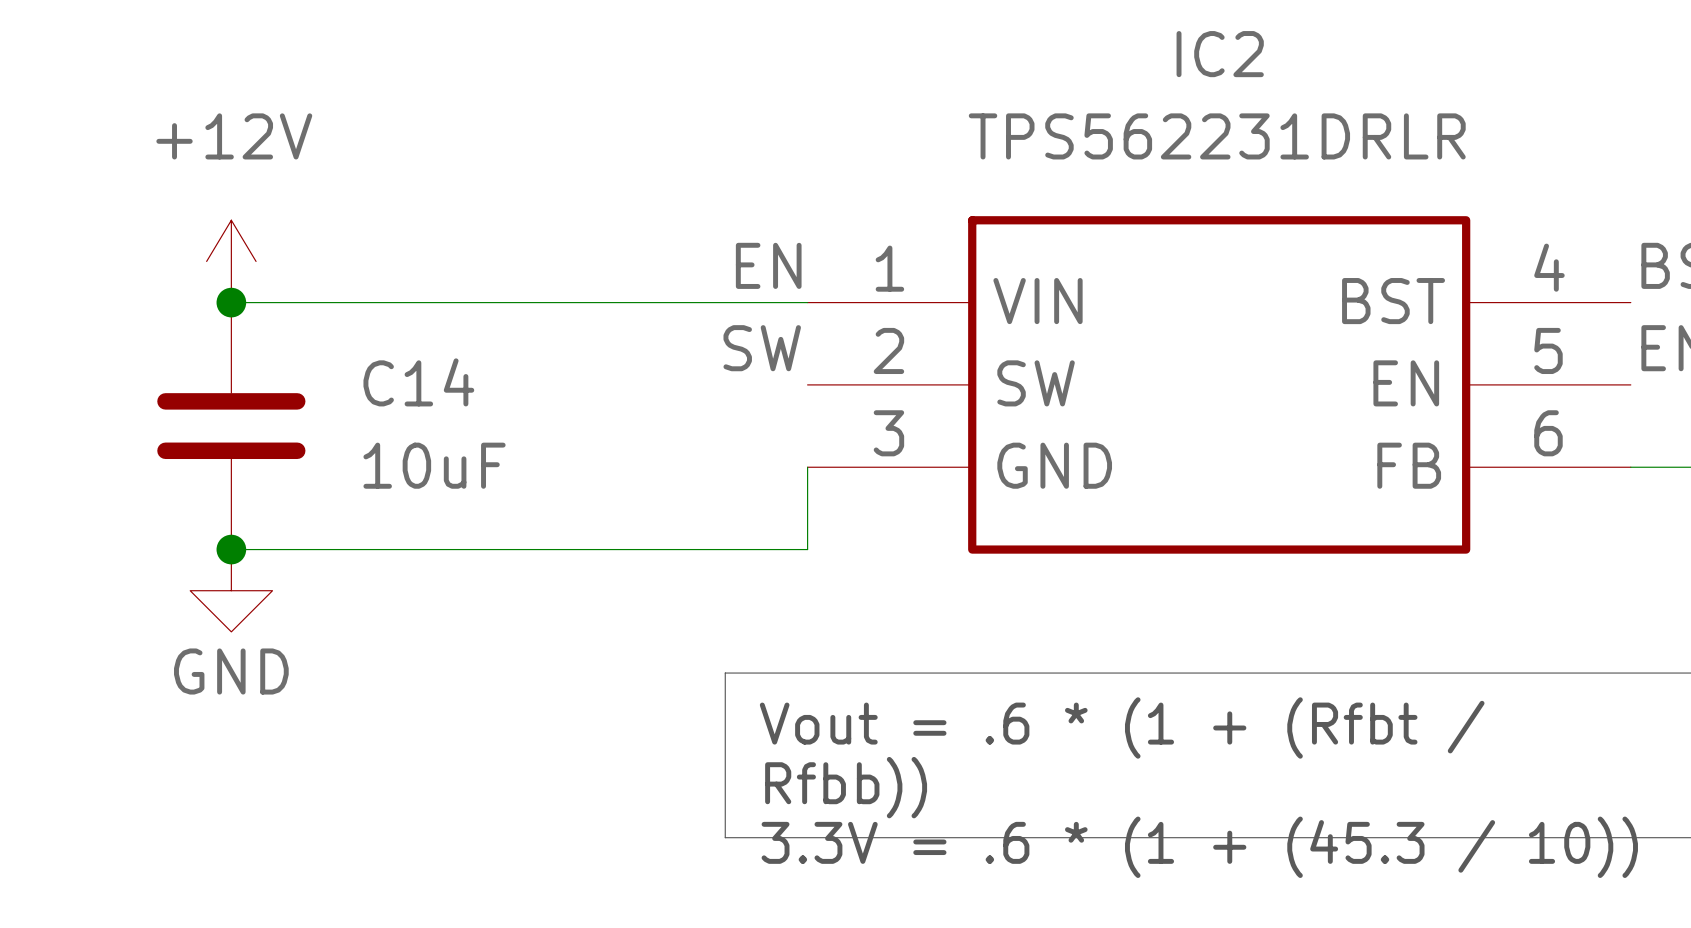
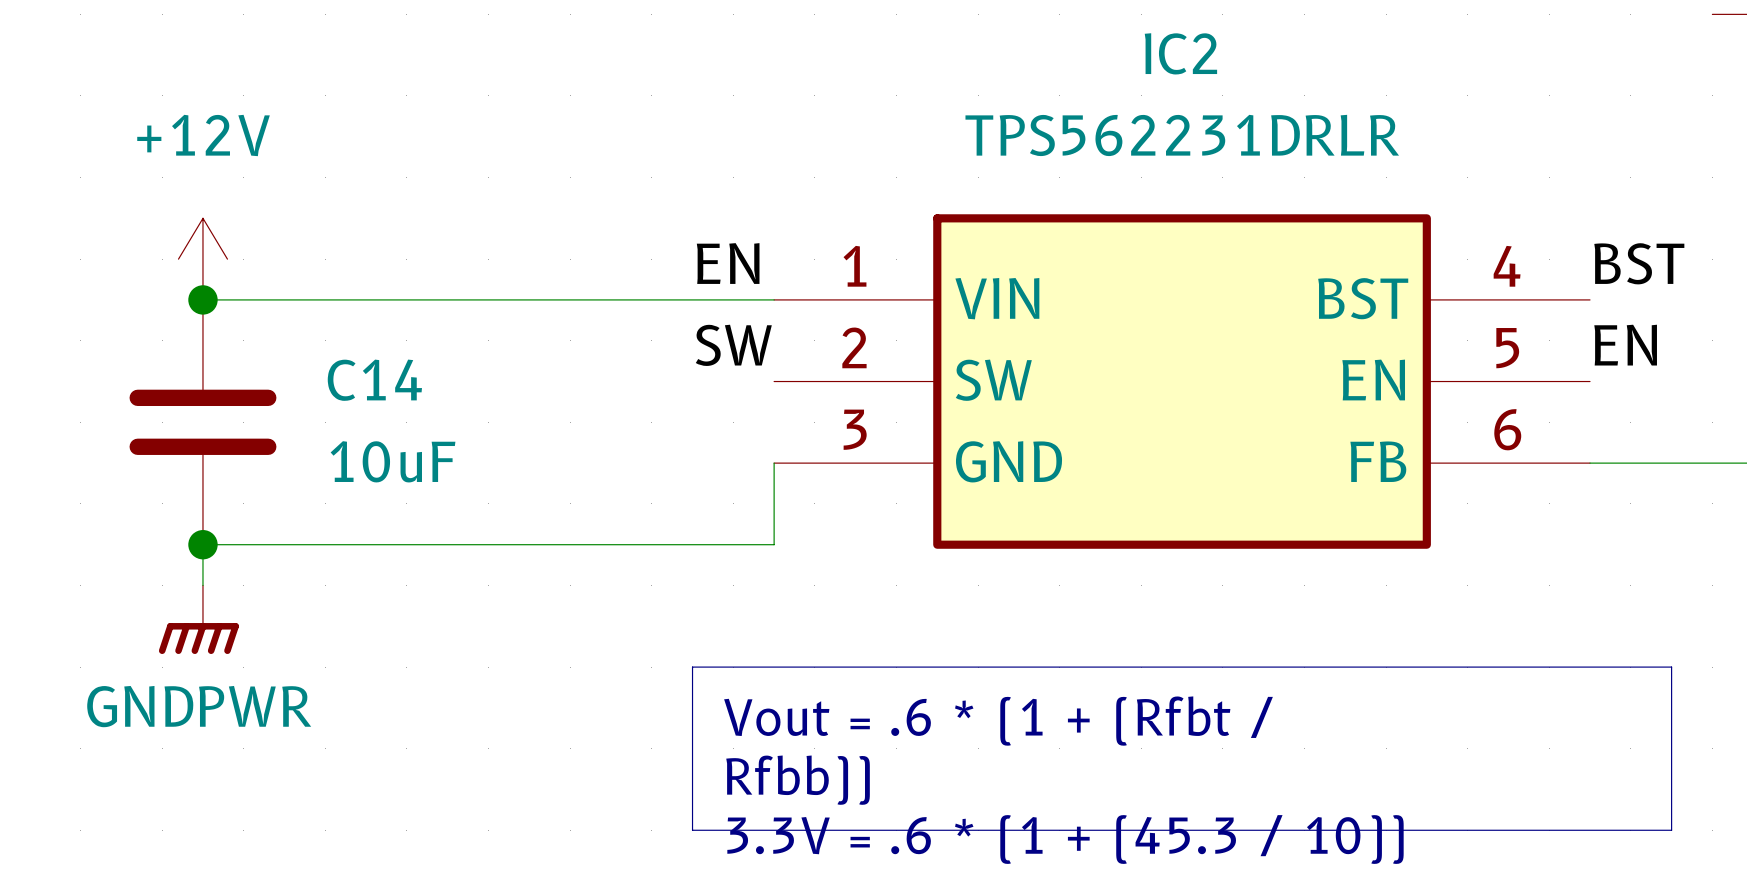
power symbol: GND (231, 590) -> none
power symbol: none -> GNDPWR (198, 619)

